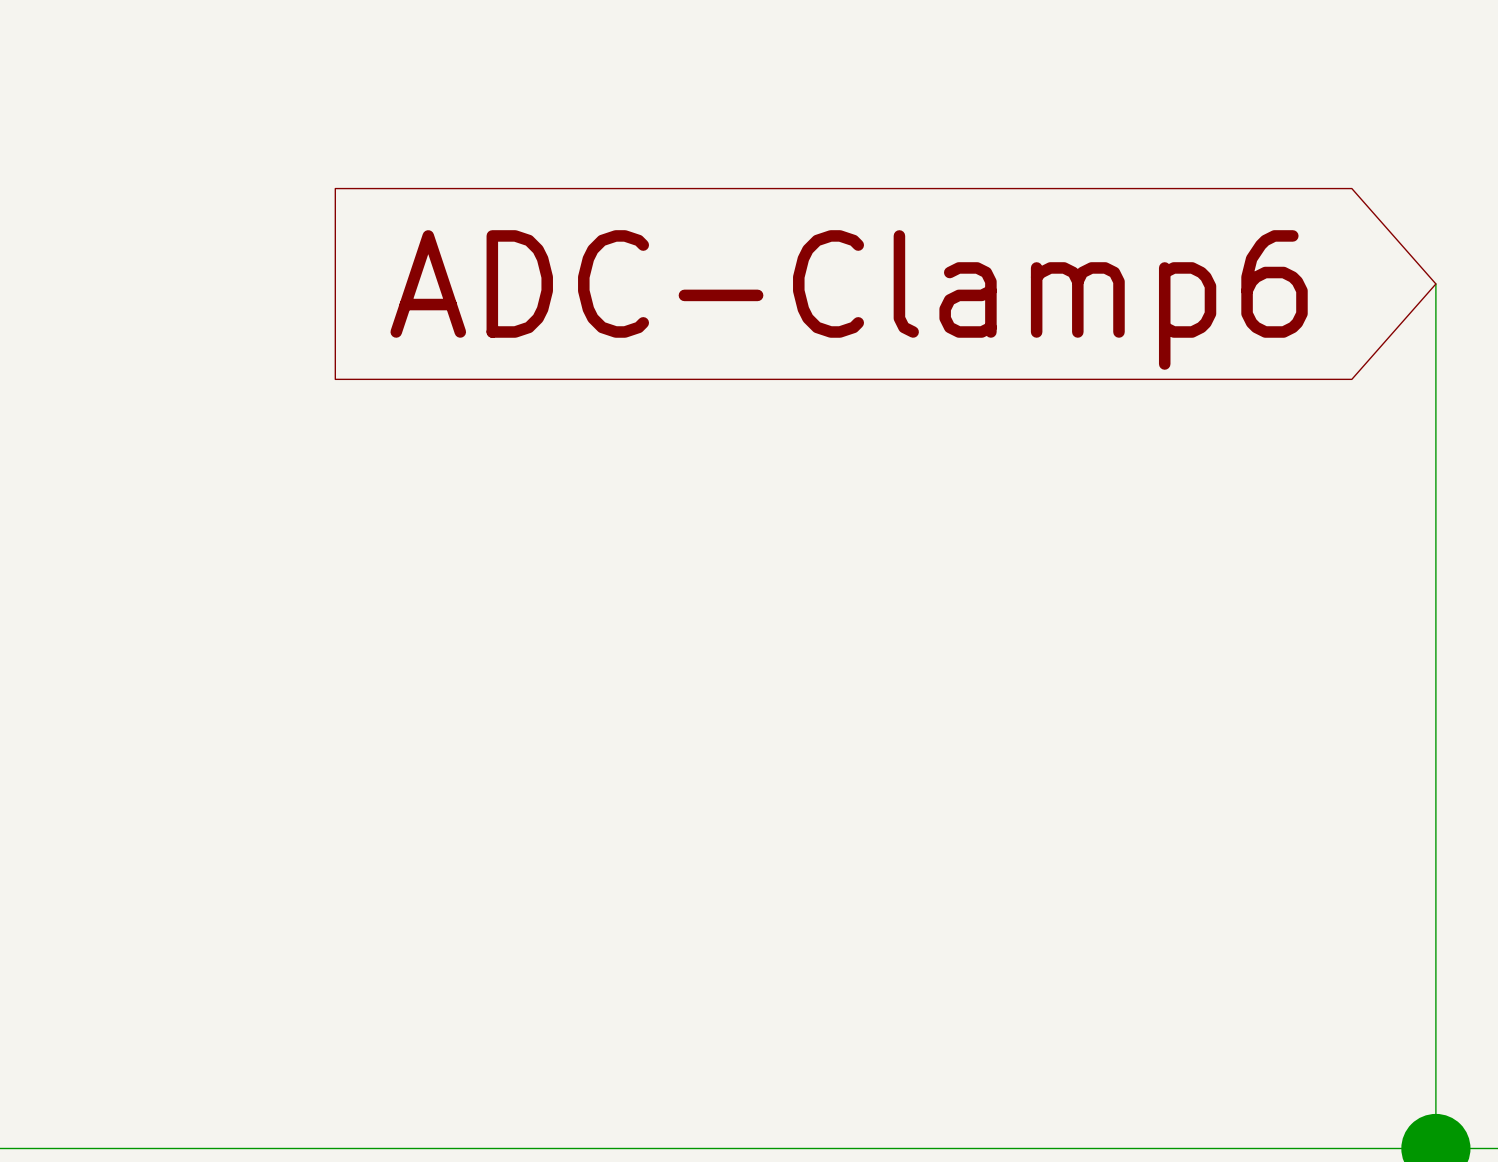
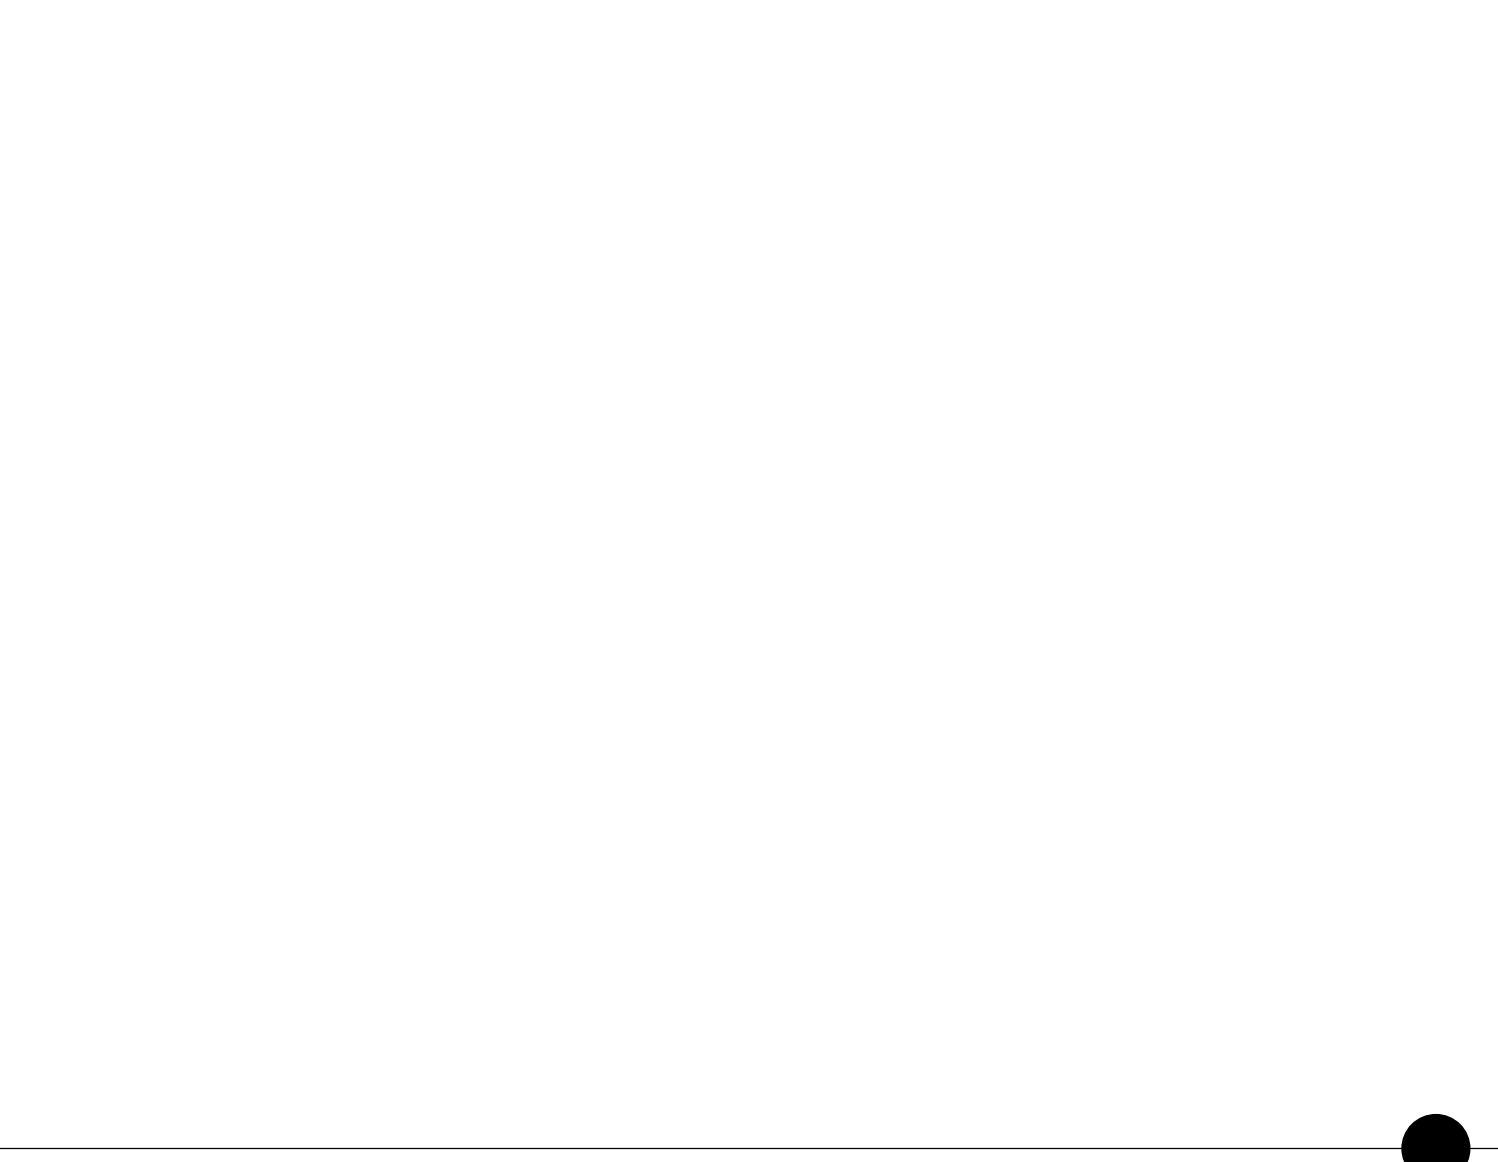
wire: (1435, 283) (1435, 1148) -> none
global label: ADC-Clamp6 (849, 299) -> none

